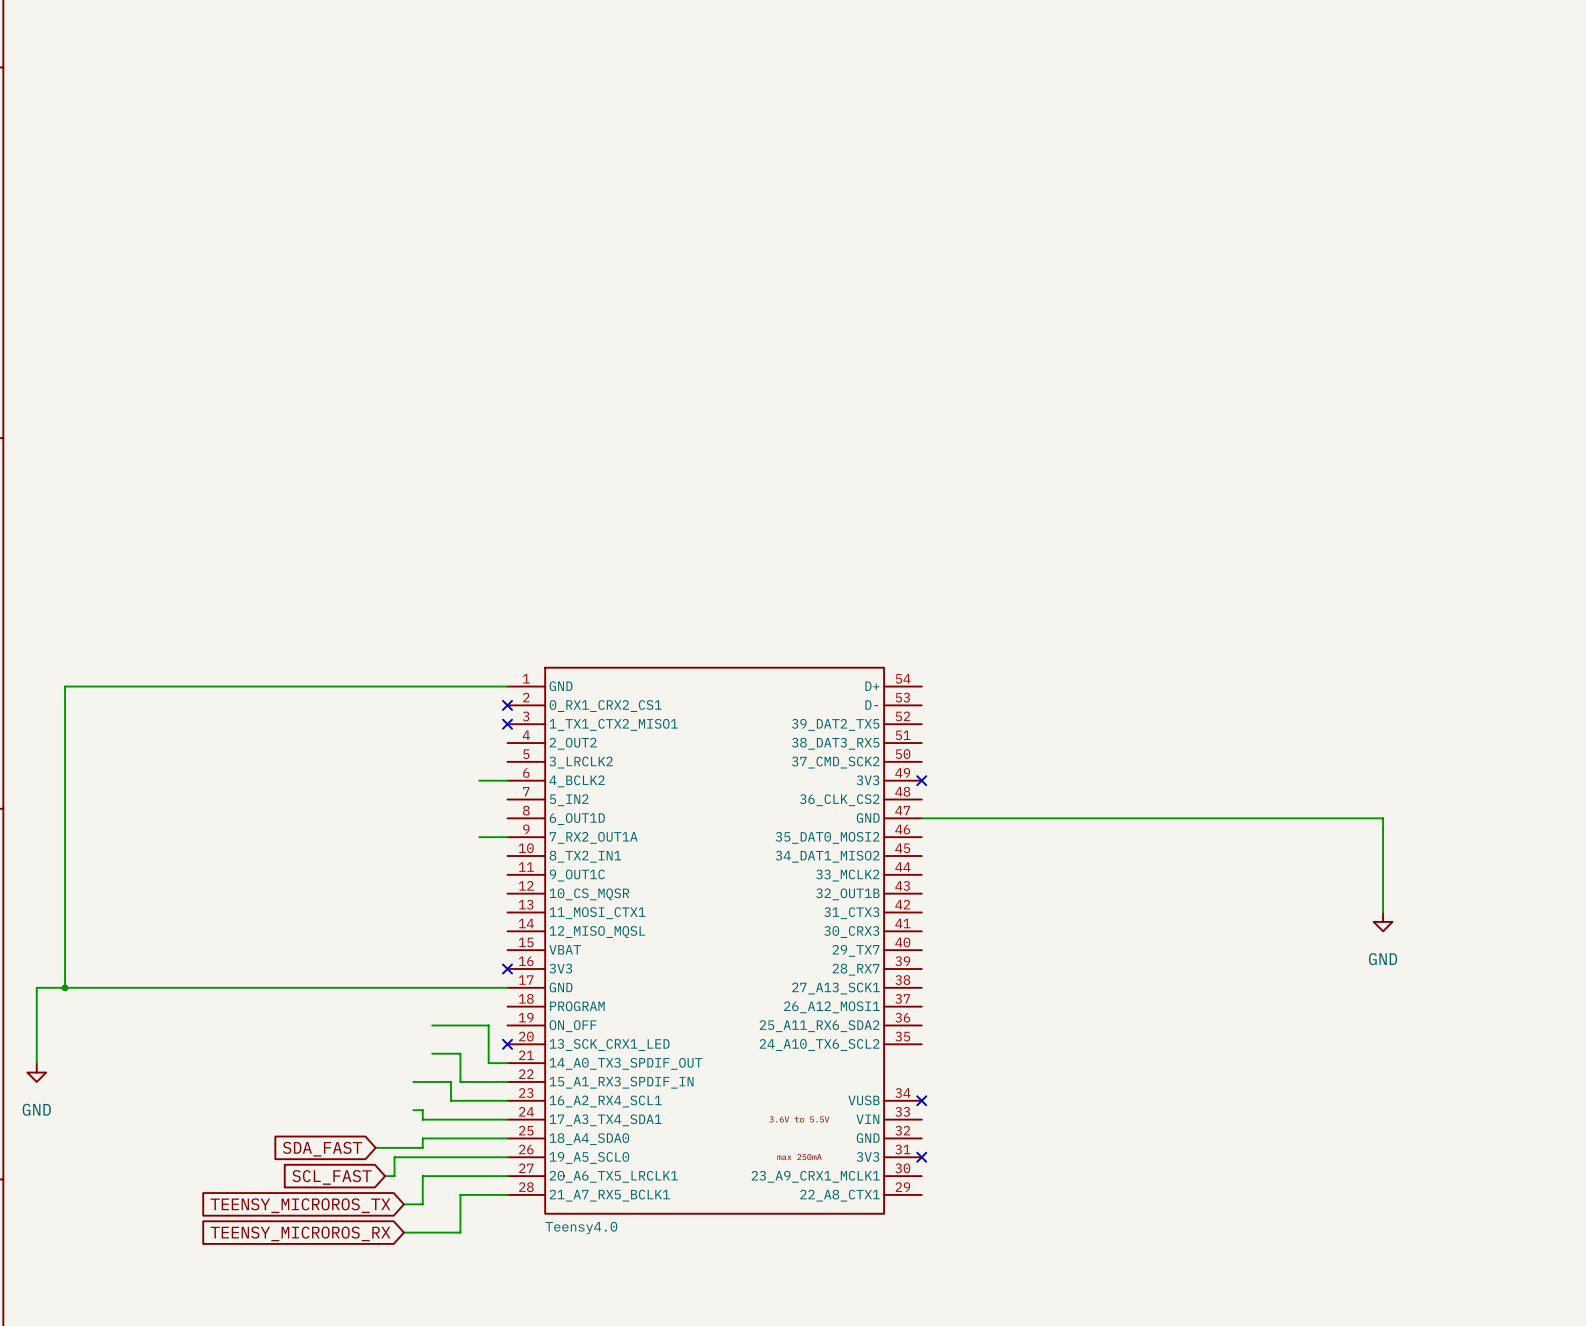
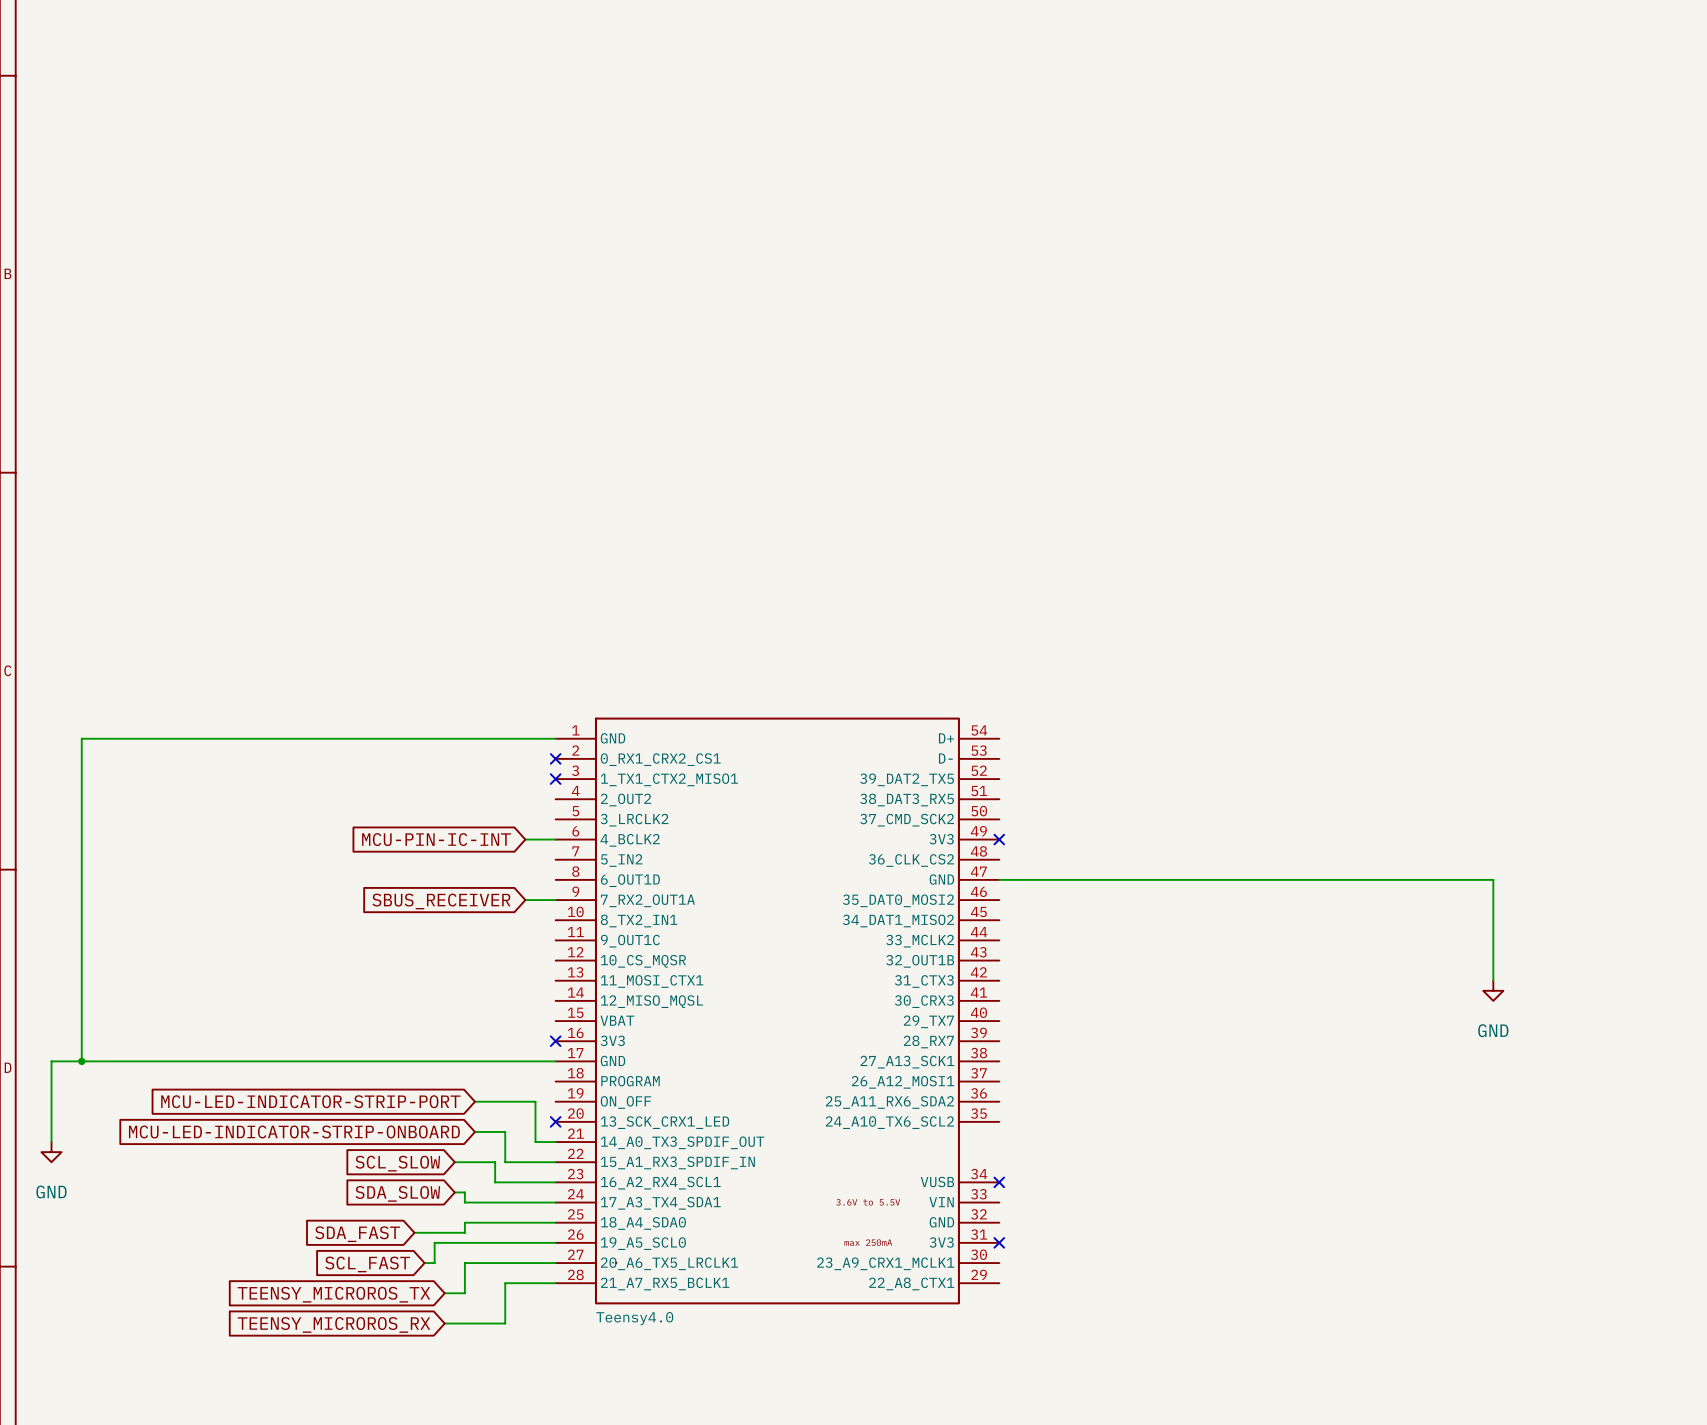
global label: none -> MCU-PIN-IC-INT (436, 839)
global label: none -> SBUS_RECEIVER (441, 901)
global label: none -> MCU-LED-INDICATOR-STRIP-PORT (310, 1101)
global label: none -> MCU-LED-INDICATOR-STRIP-ONBOARD (294, 1131)
global label: none -> SCL_SLOW (397, 1163)
global label: none -> SDA_SLOW (397, 1193)

